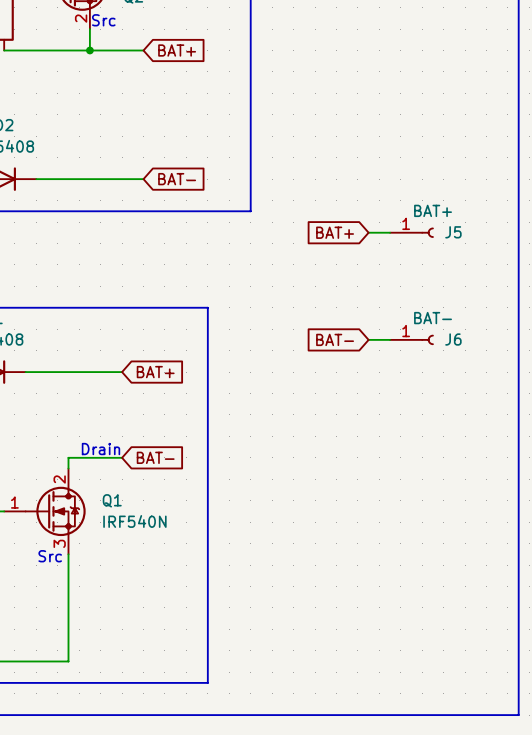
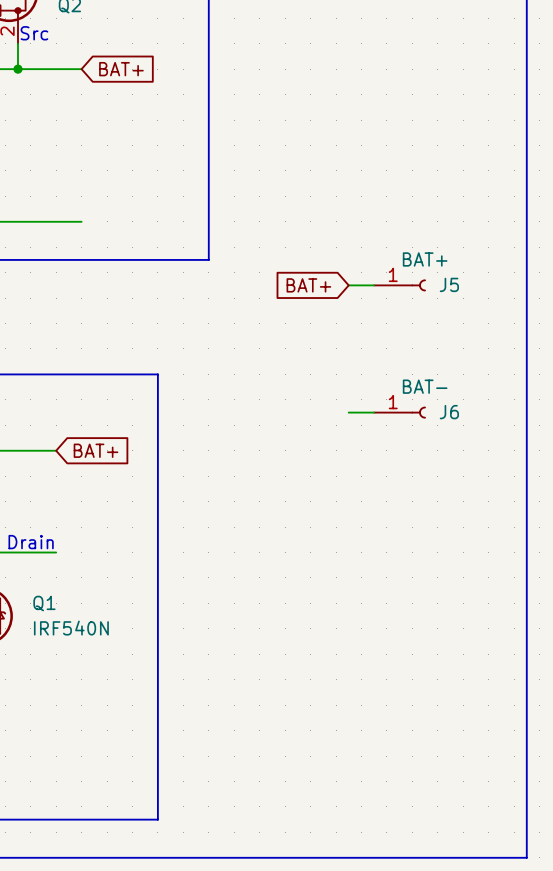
global label: BAT- (177, 179) -> none
global label: BAT- (335, 339) -> none
global label: BAT- (155, 457) -> none

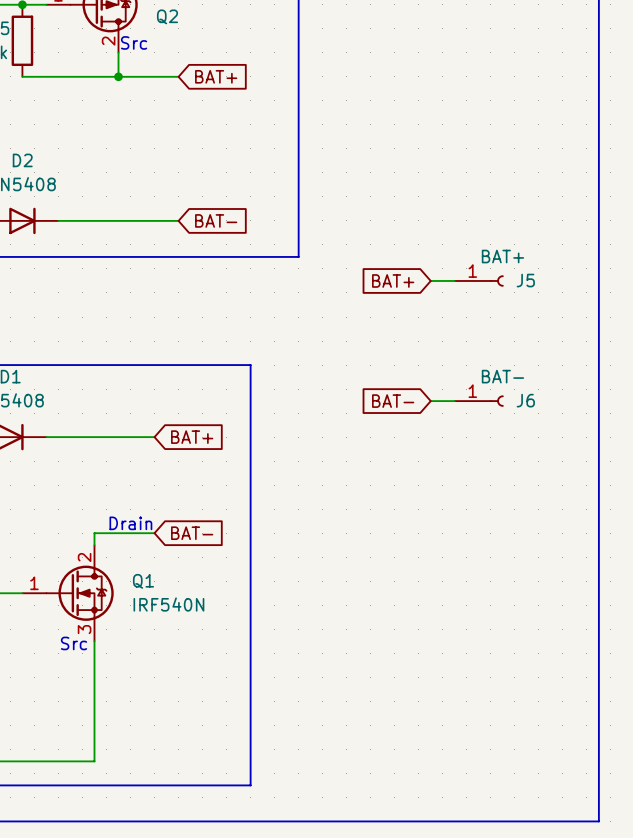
global label: none -> BAT- (216, 220)
global label: none -> BAT- (393, 401)
global label: none -> BAT- (192, 533)

